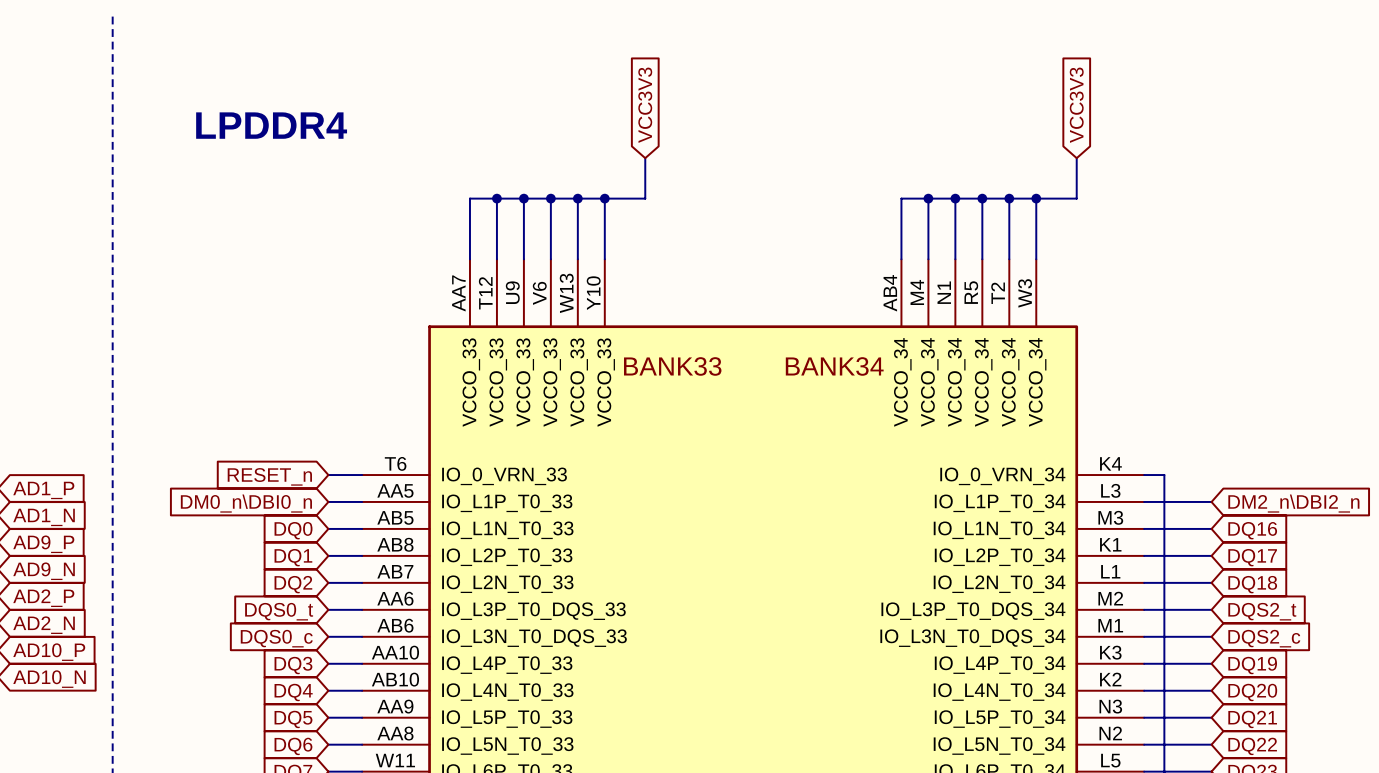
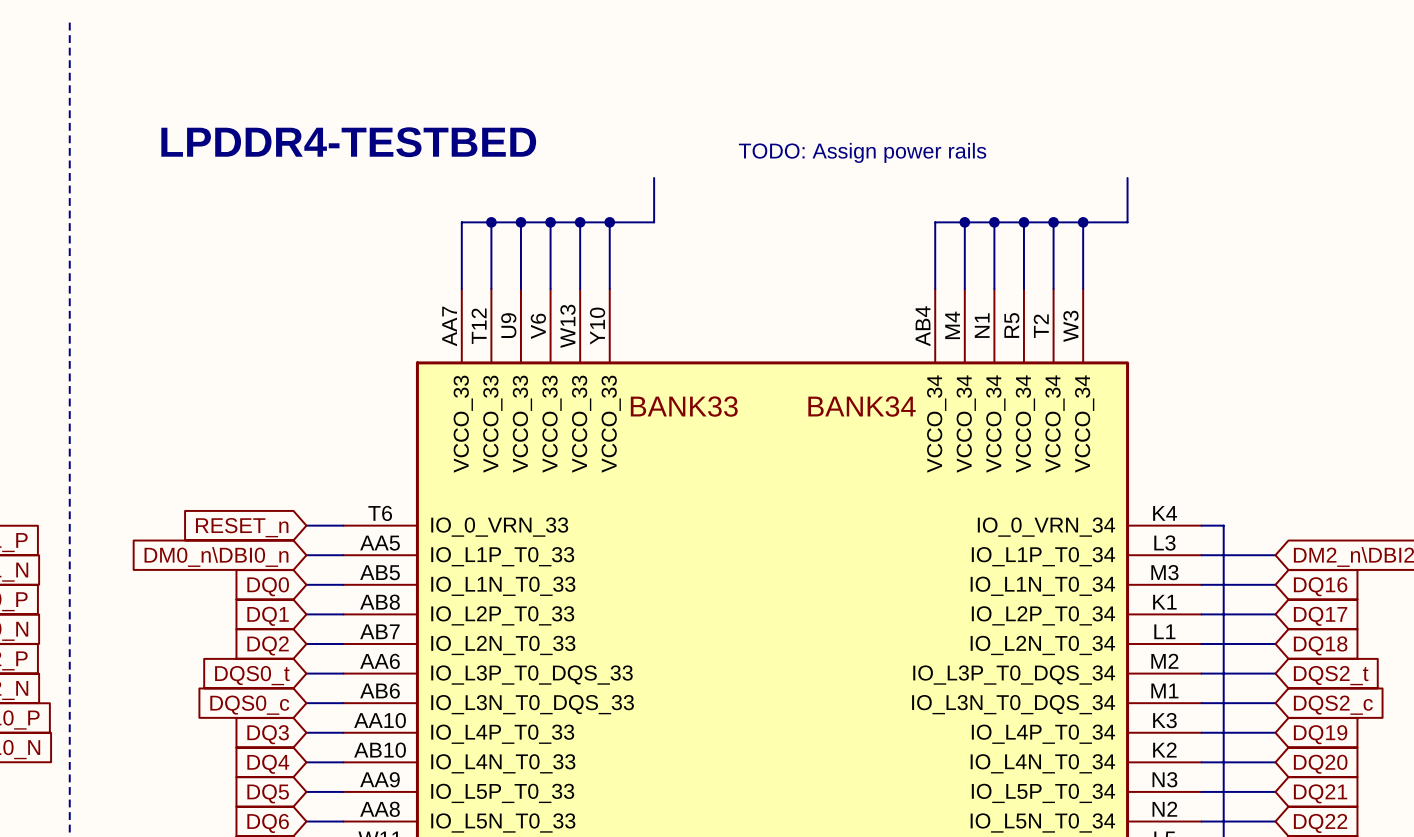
global label: VCC3V3 (645, 105) -> none
global label: VCC3V3 (1076, 105) -> none
text: LPDDR4 (271, 125) -> LPDDR4-TESTBED (348, 142)
text: none -> TODO: Assign power rails (862, 152)

